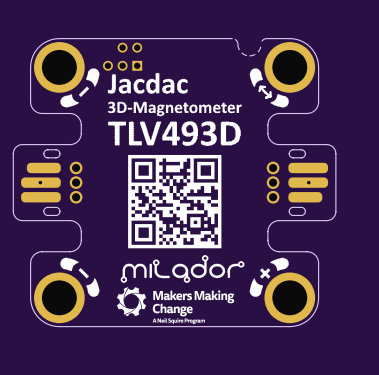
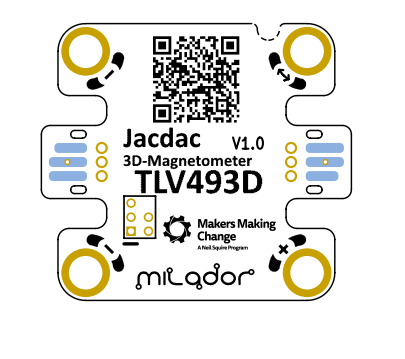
drawing: none -> [153, 36, 240, 123]
part: (122, 56) -> none
drawing position: (174, 94) -> (187, 148)
drawing position: (174, 133) -> (198, 181)
drawing: [128, 154, 222, 249] -> none
text: none -> V1.0 (247, 143)
part: none -> (139, 220)
drawing position: (182, 268) -> (194, 276)
drawing position: (175, 305) -> (219, 233)

